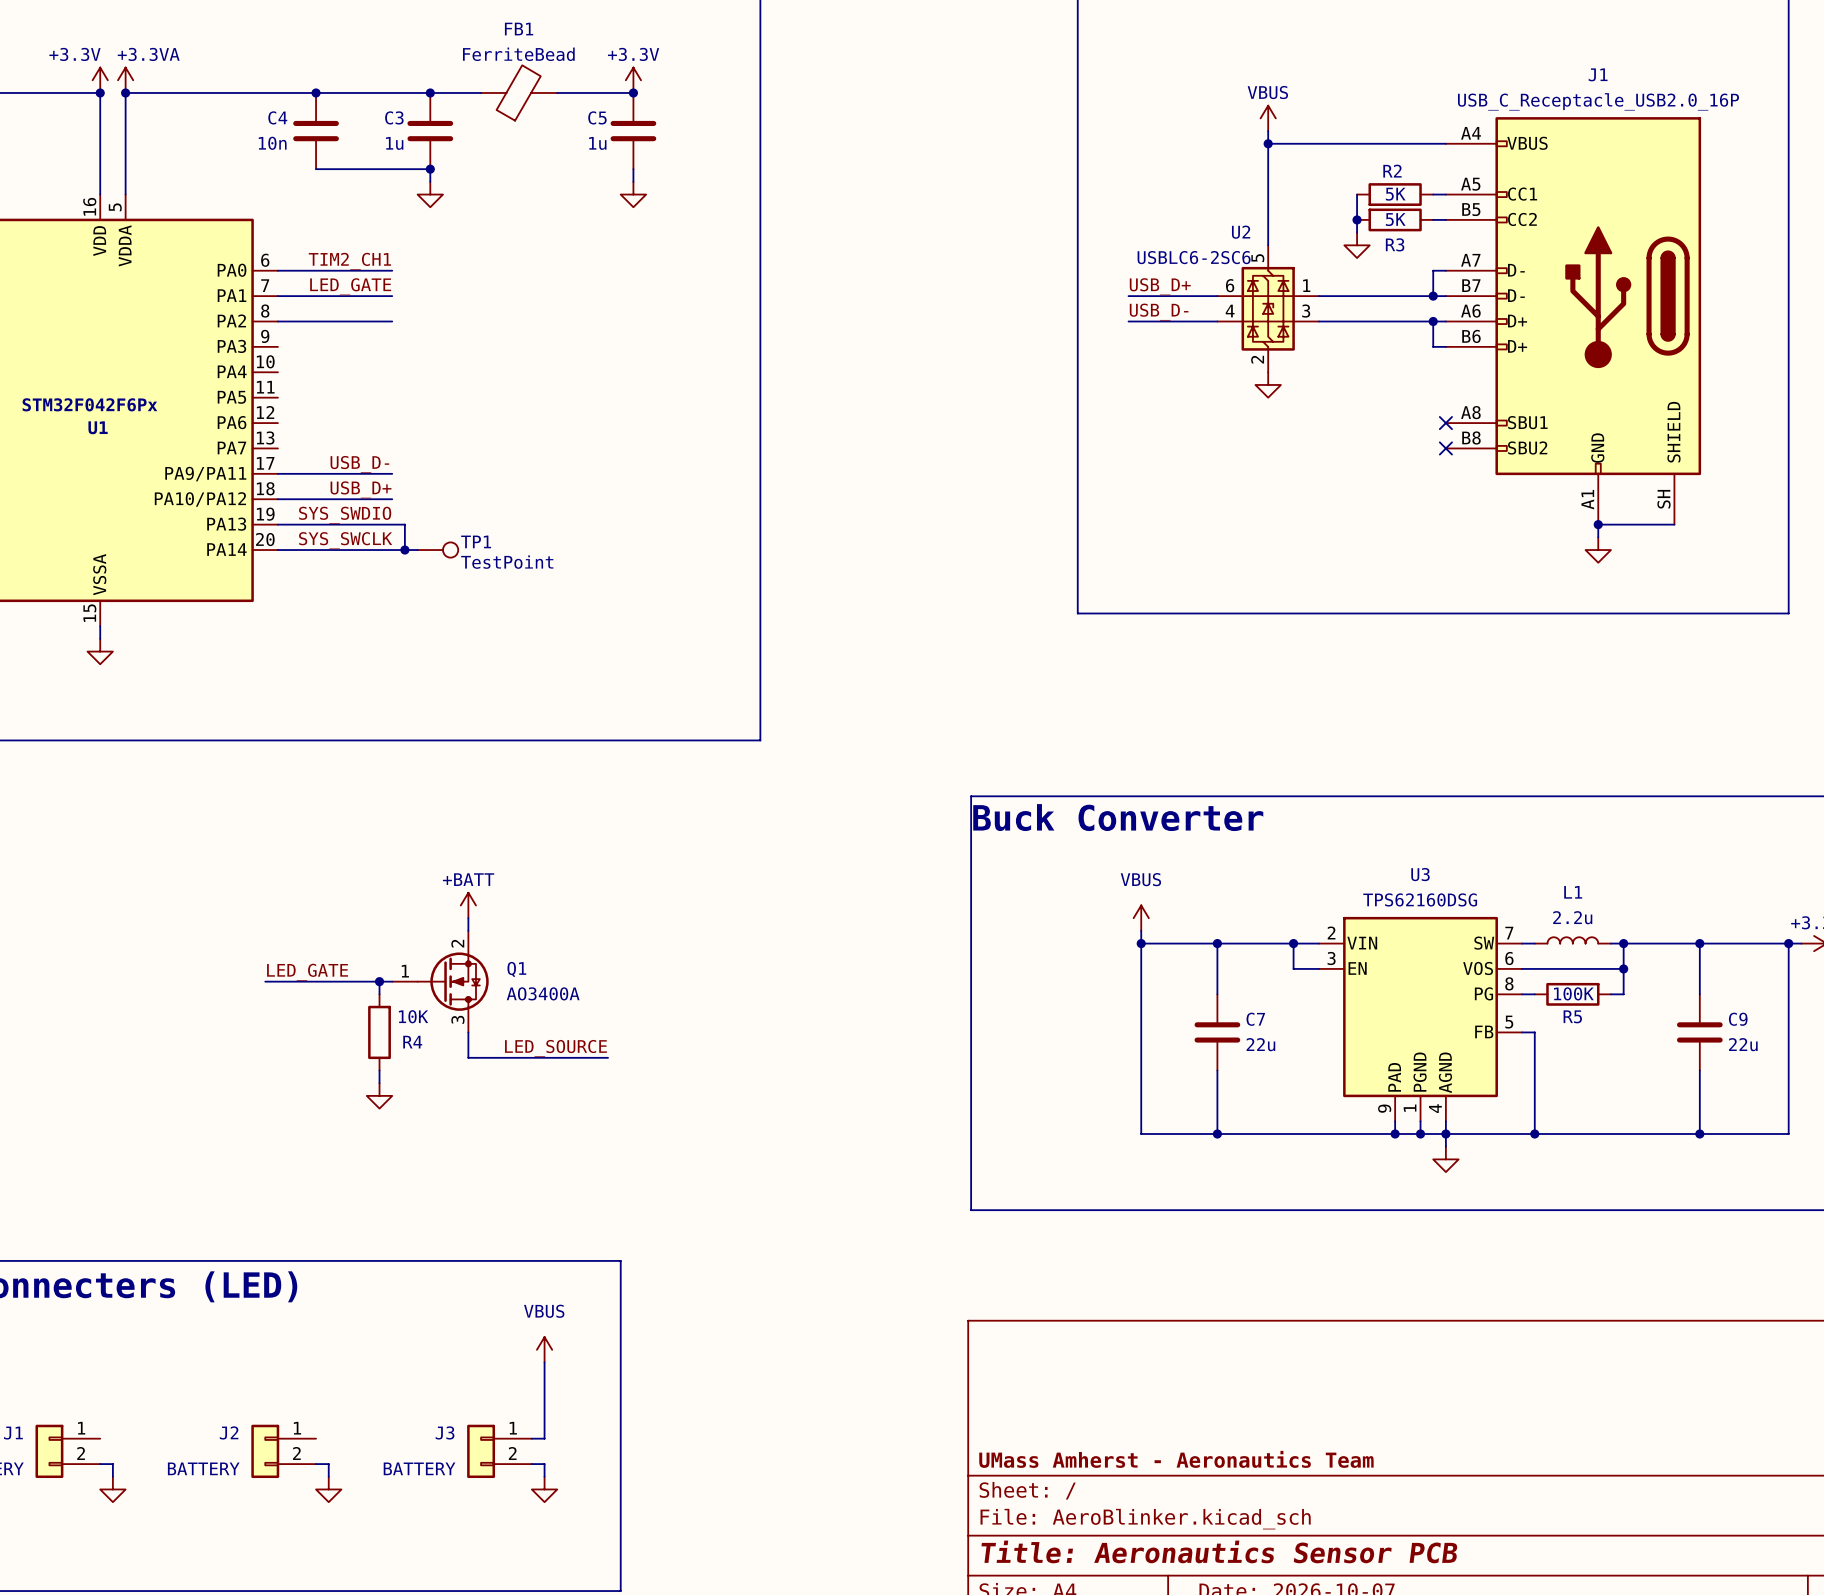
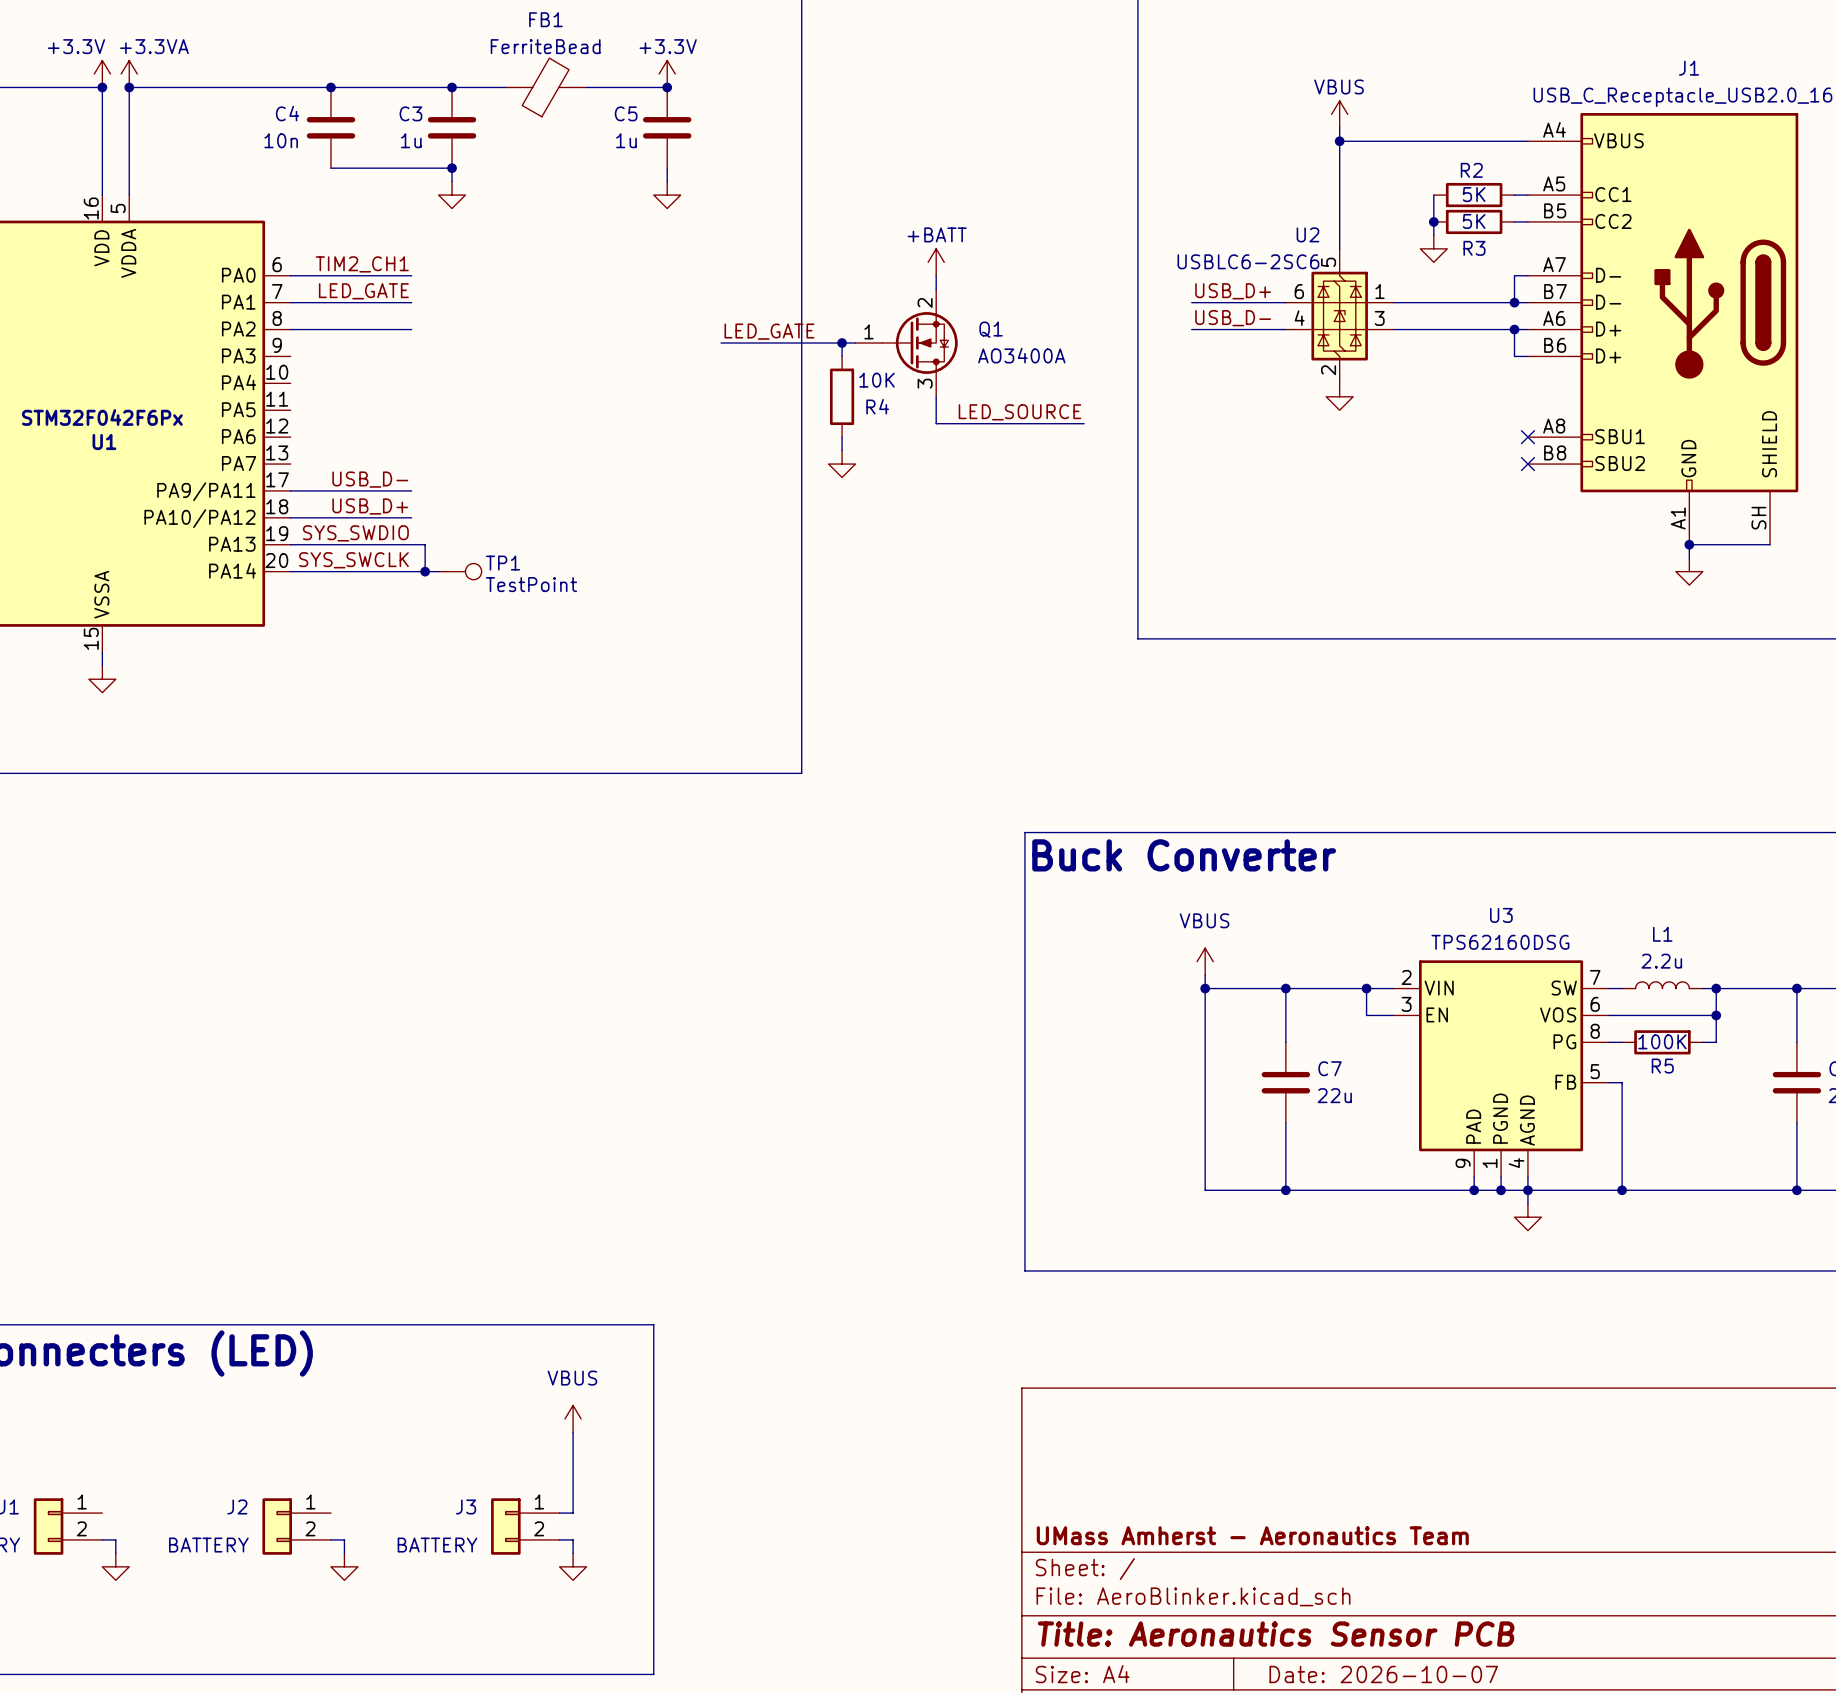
power symbol: none -> +BATT (936, 262)
wire: none -> (936, 275) (936, 289)
label: none -> LED_GATE (769, 331)
wire: none -> (721, 343) (855, 343)
wire: none -> (842, 343) (842, 356)
junction: none -> (842, 343)
wire: none -> (936, 396) (936, 423) (1084, 423)
label: none -> LED_SOURCE (1019, 412)
wire: none -> (842, 437) (842, 450)
power symbol: none -> (842, 464)
power symbol: +BATT (468, 905) -> none
wire: (468, 918) (468, 930) -> none
label: LED_GATE (307, 972) -> none
wire: (265, 981) (392, 981) -> none
wire: (379, 981) (379, 994) -> none
junction: (379, 981) -> none
Q1 position: (440, 981) -> (906, 343)
R4 position: (379, 1032) -> (842, 396)
wire: (468, 1032) (468, 1057) (608, 1057) -> none
label: LED_SOURCE (555, 1048) -> none
wire: (379, 1070) (379, 1083) -> none
power symbol: (379, 1095) -> none

